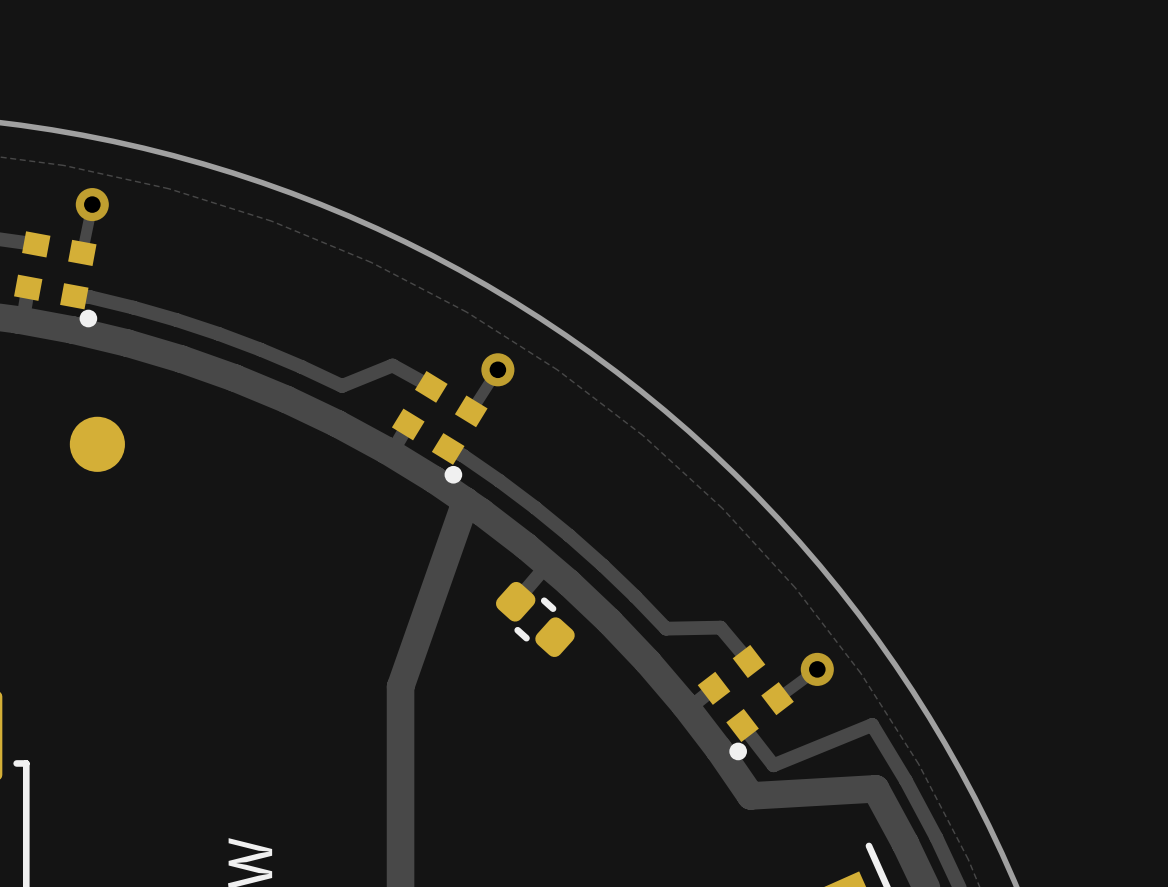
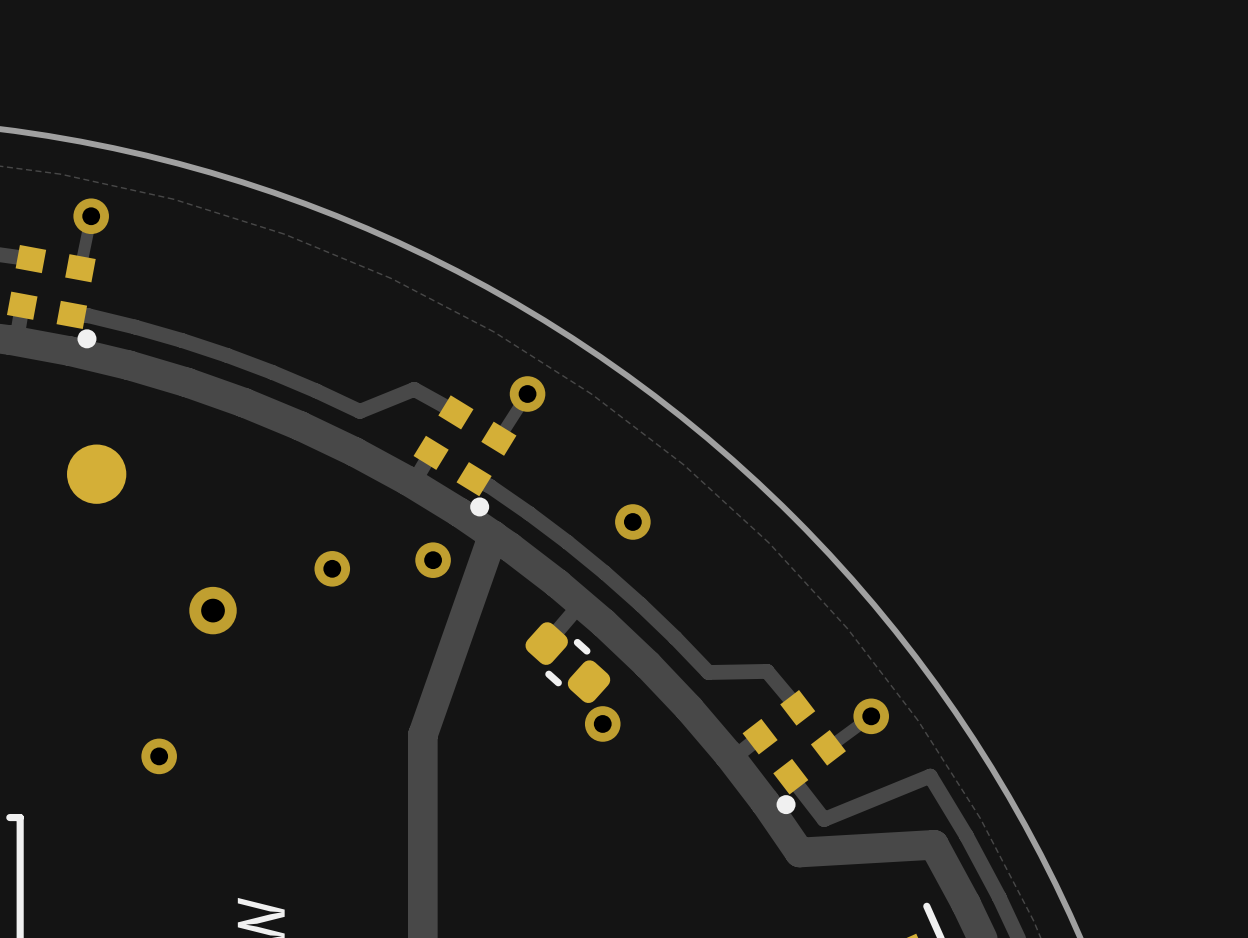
via: none -> (632, 521)
via: none -> (433, 560)
via: none -> (332, 568)
via: none -> (213, 610)
via: none -> (602, 723)
via: none -> (159, 756)

